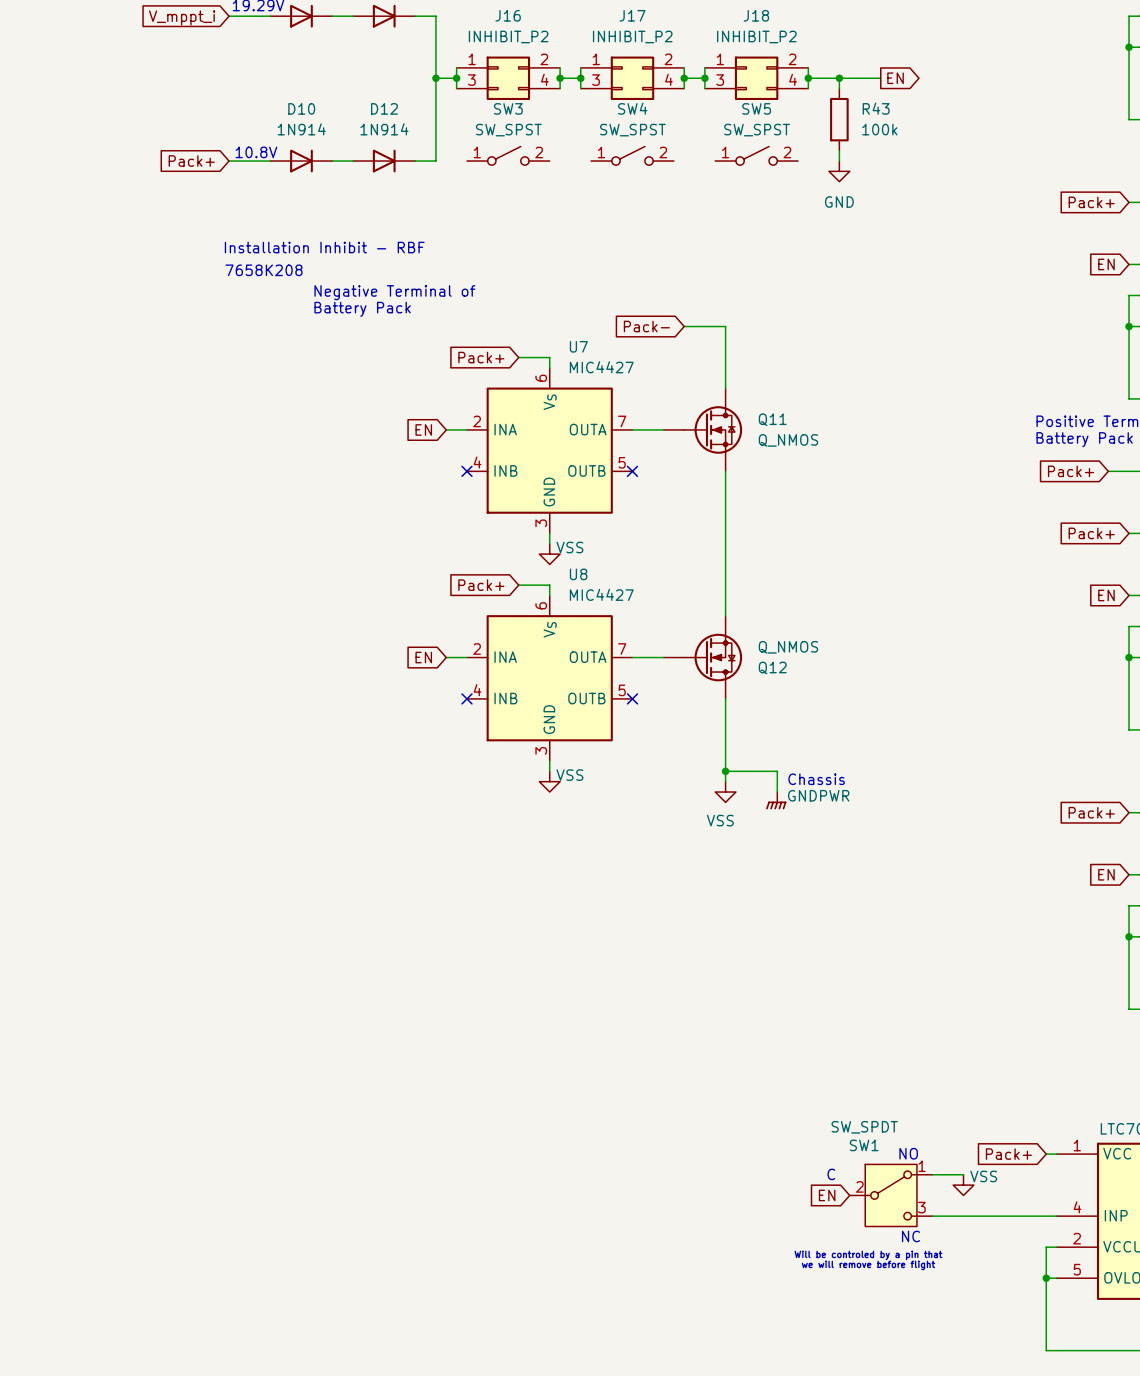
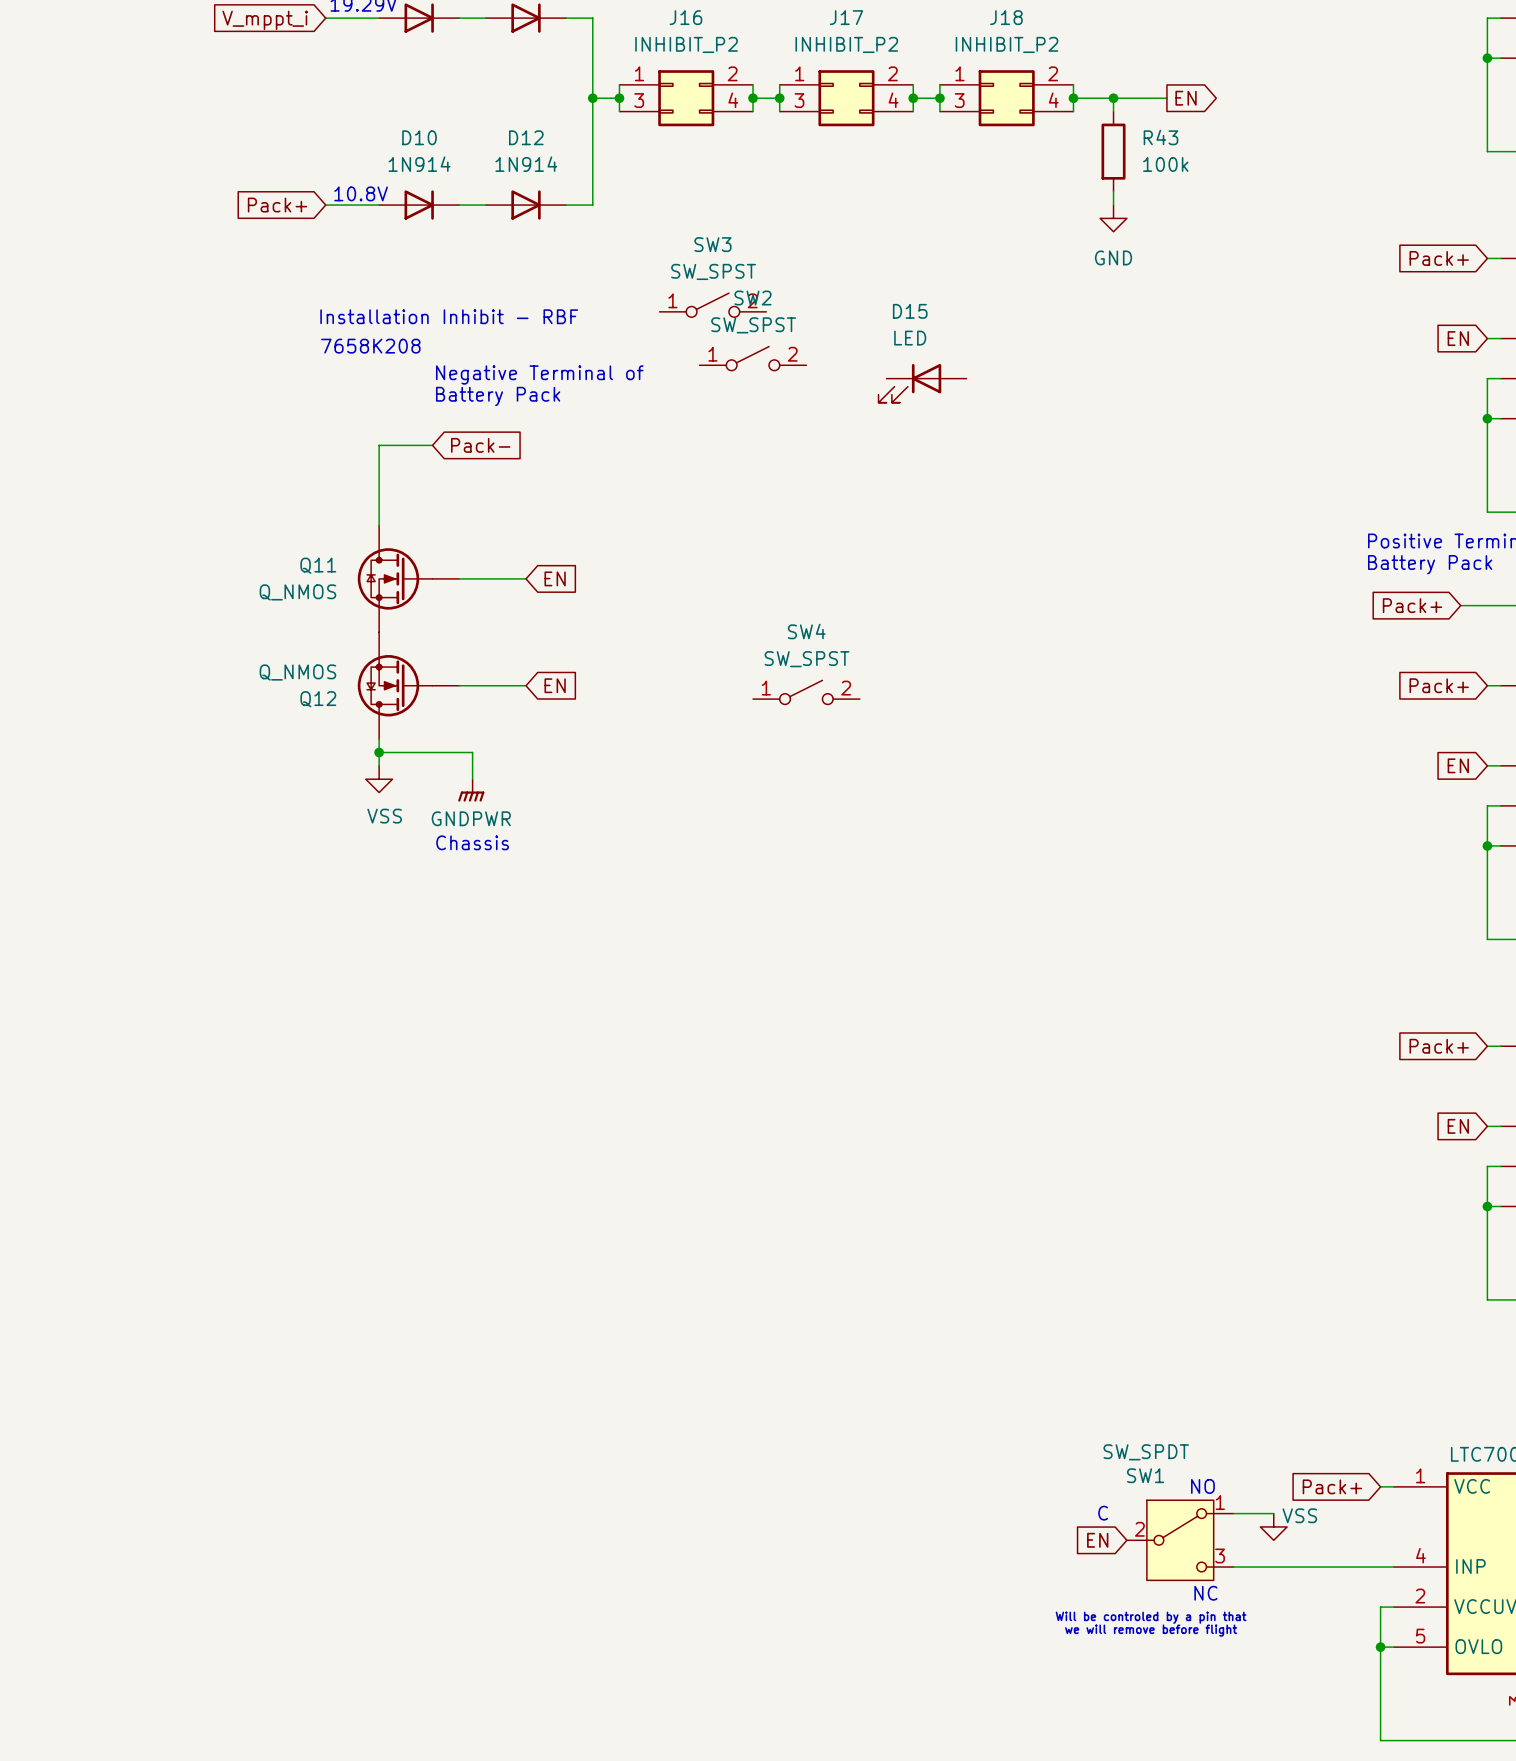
SW3 position: (508, 155) -> (712, 305)
SW4 position: (632, 155) -> (806, 692)
SW5: SW_SPST (756, 155) -> none
SW2: none -> SW_SPST (753, 358)
D15: none -> LED (922, 383)
global label: Pack- (646, 326) -> none
wire: (684, 326) (725, 326) (725, 388) -> none
wire: none -> (432, 445) (379, 445) (379, 525)
global label: none -> Pack- (480, 445)
global label: Pack+ (481, 357) -> none
wire: (518, 357) (549, 357) (549, 367) -> none
global label rotation: 0° (423, 429) -> 180° (555, 578)
wire: (446, 429) (466, 429) -> none
wire: (632, 429) (663, 429) -> none
Q11 position: (702, 429) -> (408, 578)
Q11 flip: as is (713, 429) -> left-right (395, 578)
wire: none -> (459, 578) (526, 578)
U7: MIC4427 (549, 450) -> none
no-connect mark: (466, 471) -> none
no-connect mark: (632, 471) -> none
wire: (725, 471) (725, 616) -> none
wire: none -> (459, 685) (526, 685)
global label: none -> EN (555, 685)
wire: (549, 533) (549, 543) -> none
power symbol: VSS (549, 554) -> none
wire: none -> (379, 739) (379, 765)
wire: none -> (379, 752) (472, 752) (472, 779)
junction: none -> (379, 752)
global label: Pack+ (481, 585) -> none
wire: (518, 585) (549, 585) (549, 595) -> none
power symbol: none -> VSS (379, 779)
power symbol: none -> GNDPWR (471, 790)
text: none -> Chassis (472, 842)
global label: EN (423, 657) -> none
wire: (446, 657) (466, 657) -> none
wire: (632, 657) (663, 657) -> none
Q12 position: (702, 657) -> (408, 685)
Q12 flip: as is (713, 657) -> left-right (395, 685)
U8: MIC4427 (549, 678) -> none
no-connect mark: (466, 698) -> none
no-connect mark: (632, 698) -> none
wire: (725, 698) (725, 781) -> none
wire: (549, 760) (549, 771) -> none
wire: (725, 771) (777, 771) (777, 792) -> none
junction: (725, 771) -> none
text: Chassis (816, 779) -> none
power symbol: VSS (549, 781) -> none
power symbol: VSS (725, 792) -> none
power symbol: GNDPWR (776, 800) -> none

